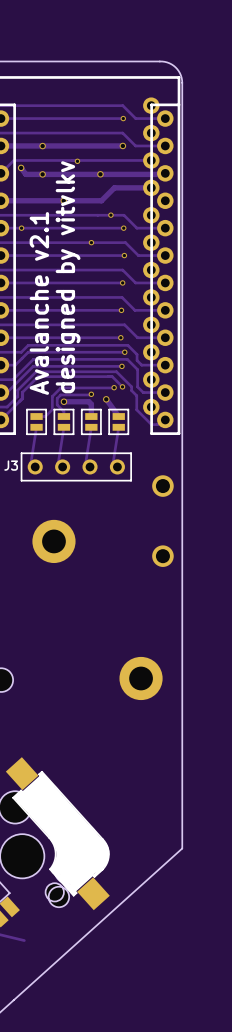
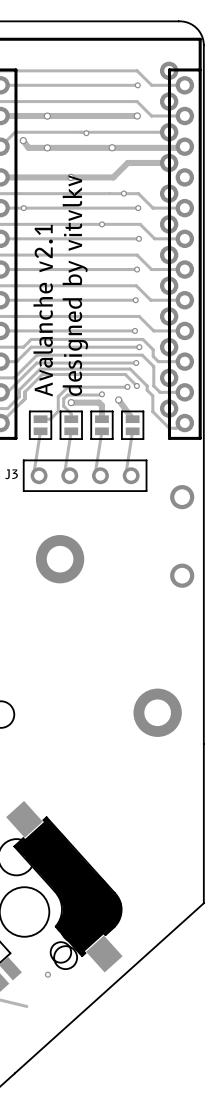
via: none -> (47, 974)

